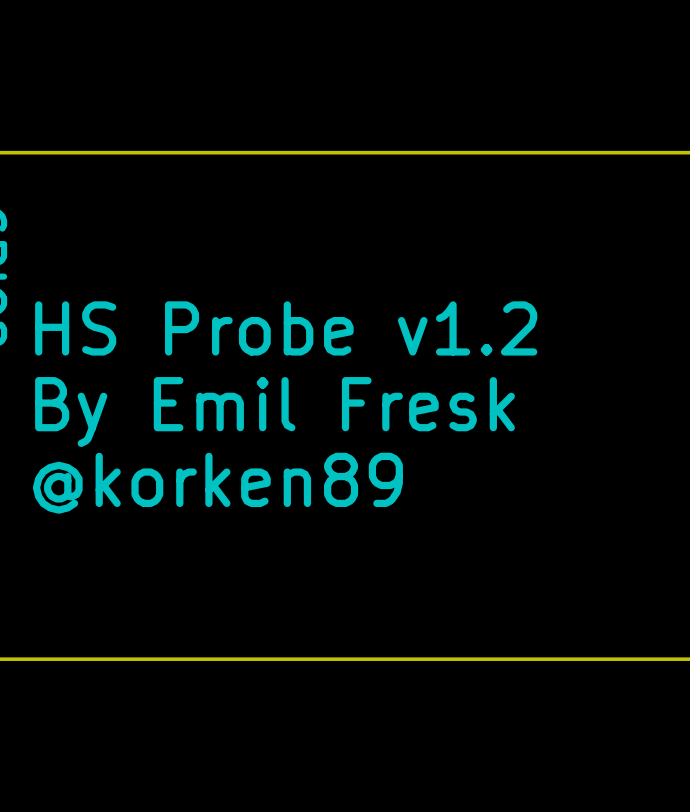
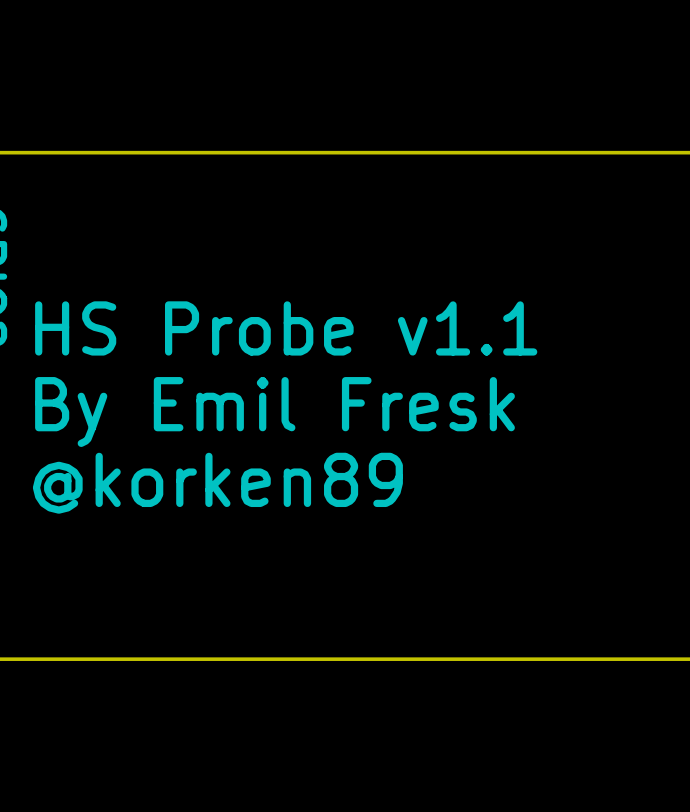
text: HS Probe v1.2 (286, 328) -> HS Probe v1.1 (286, 328)

